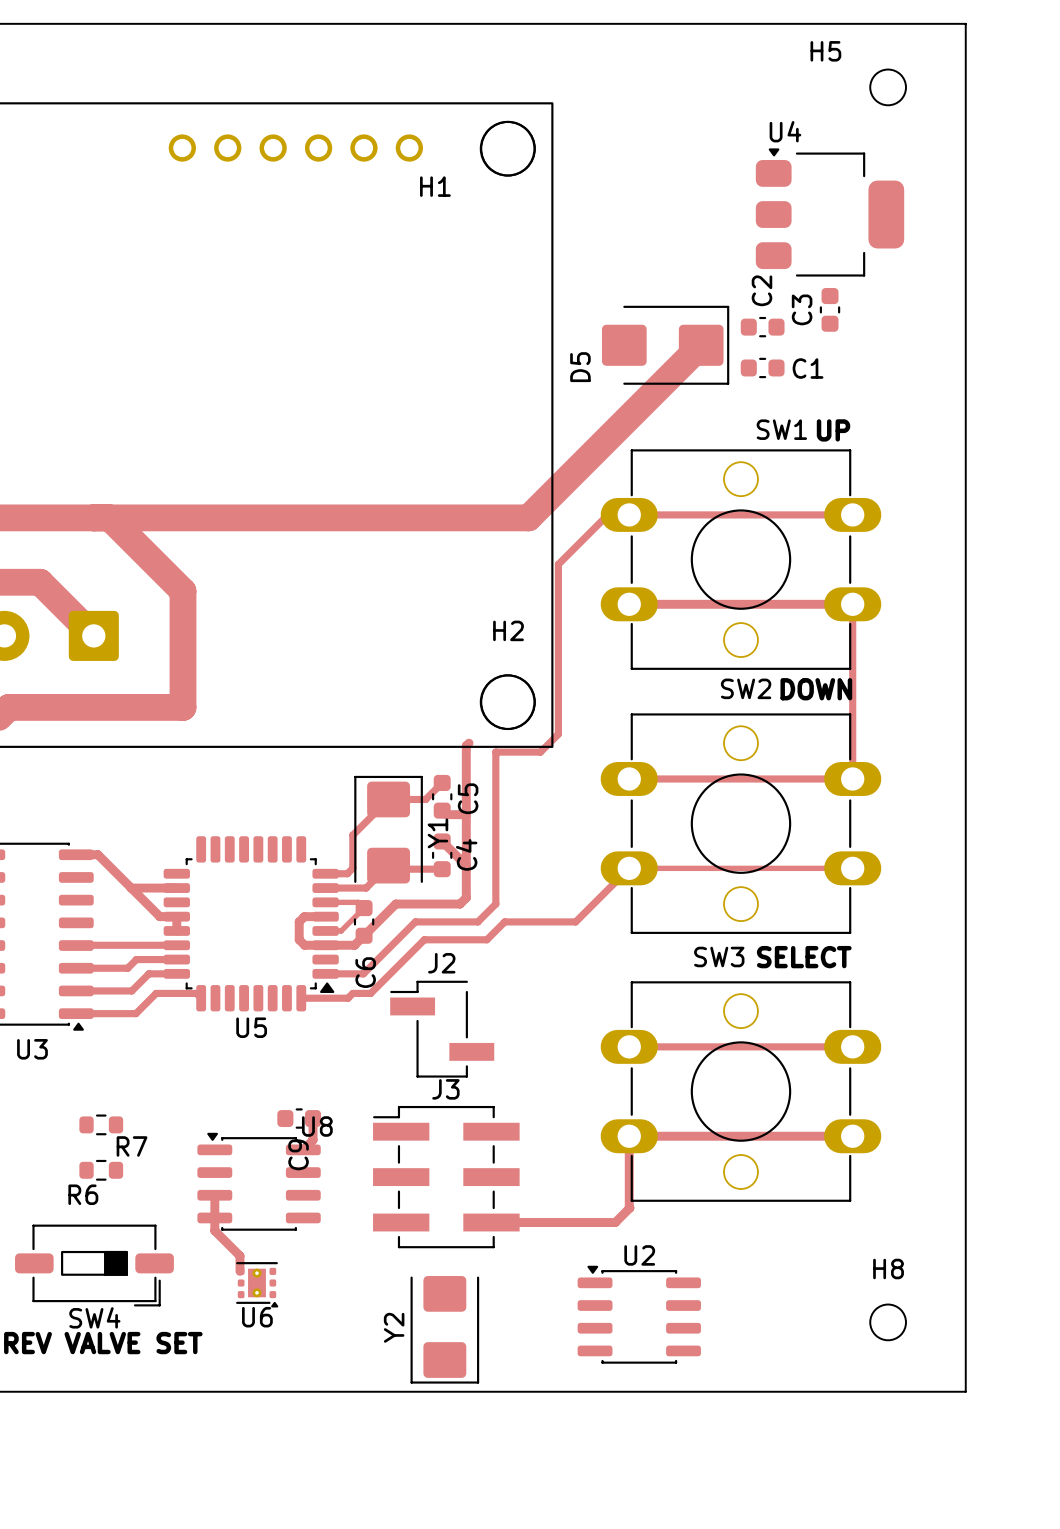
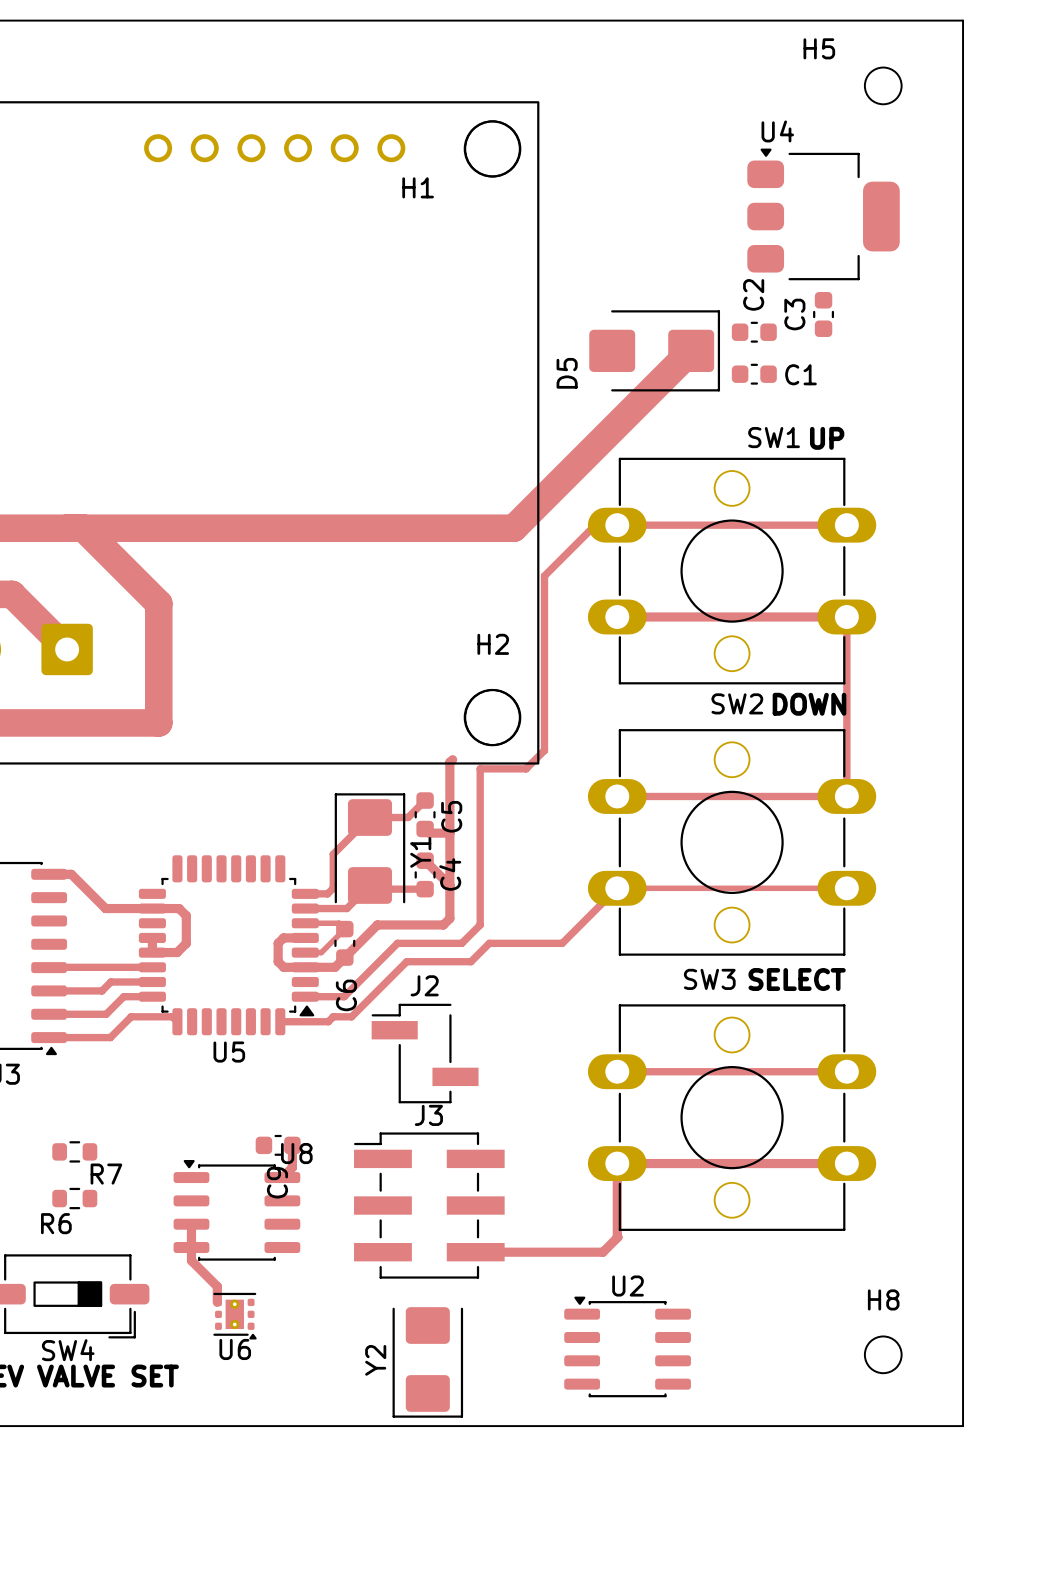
track: (131, 888) (159, 916) (176, 916) -> none
track: none -> (152, 908) (179, 908) (186, 915) (186, 943) (177, 952) (152, 952)

